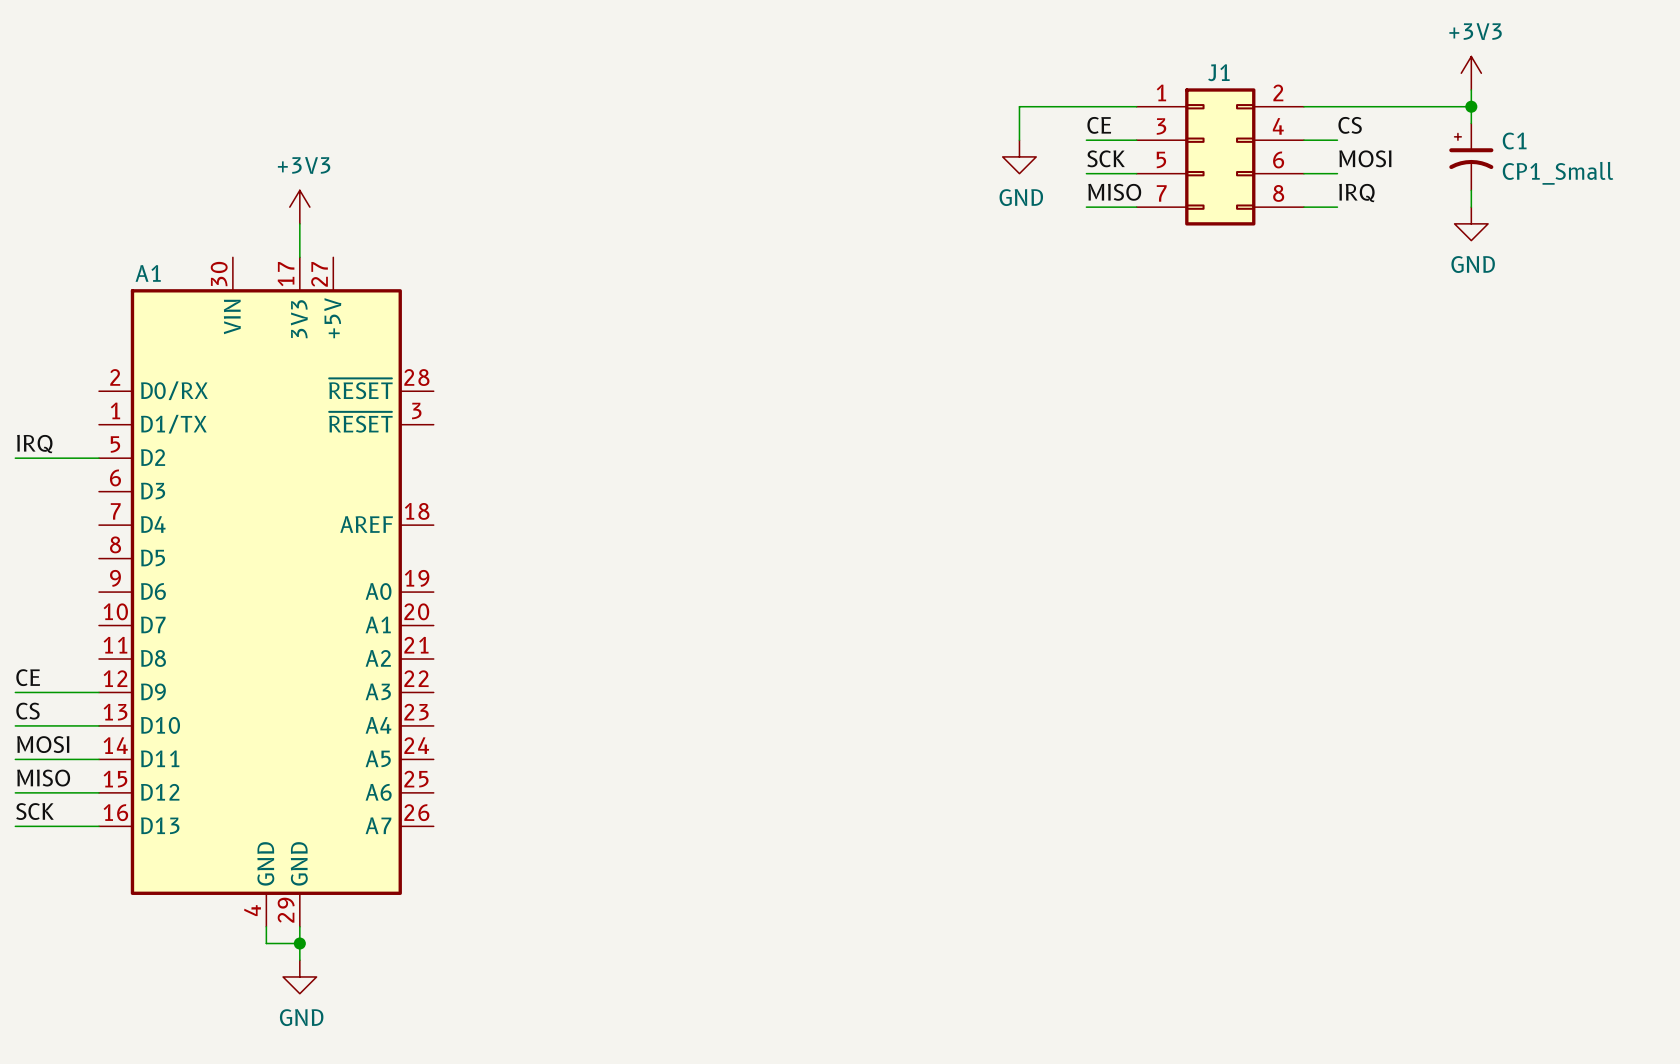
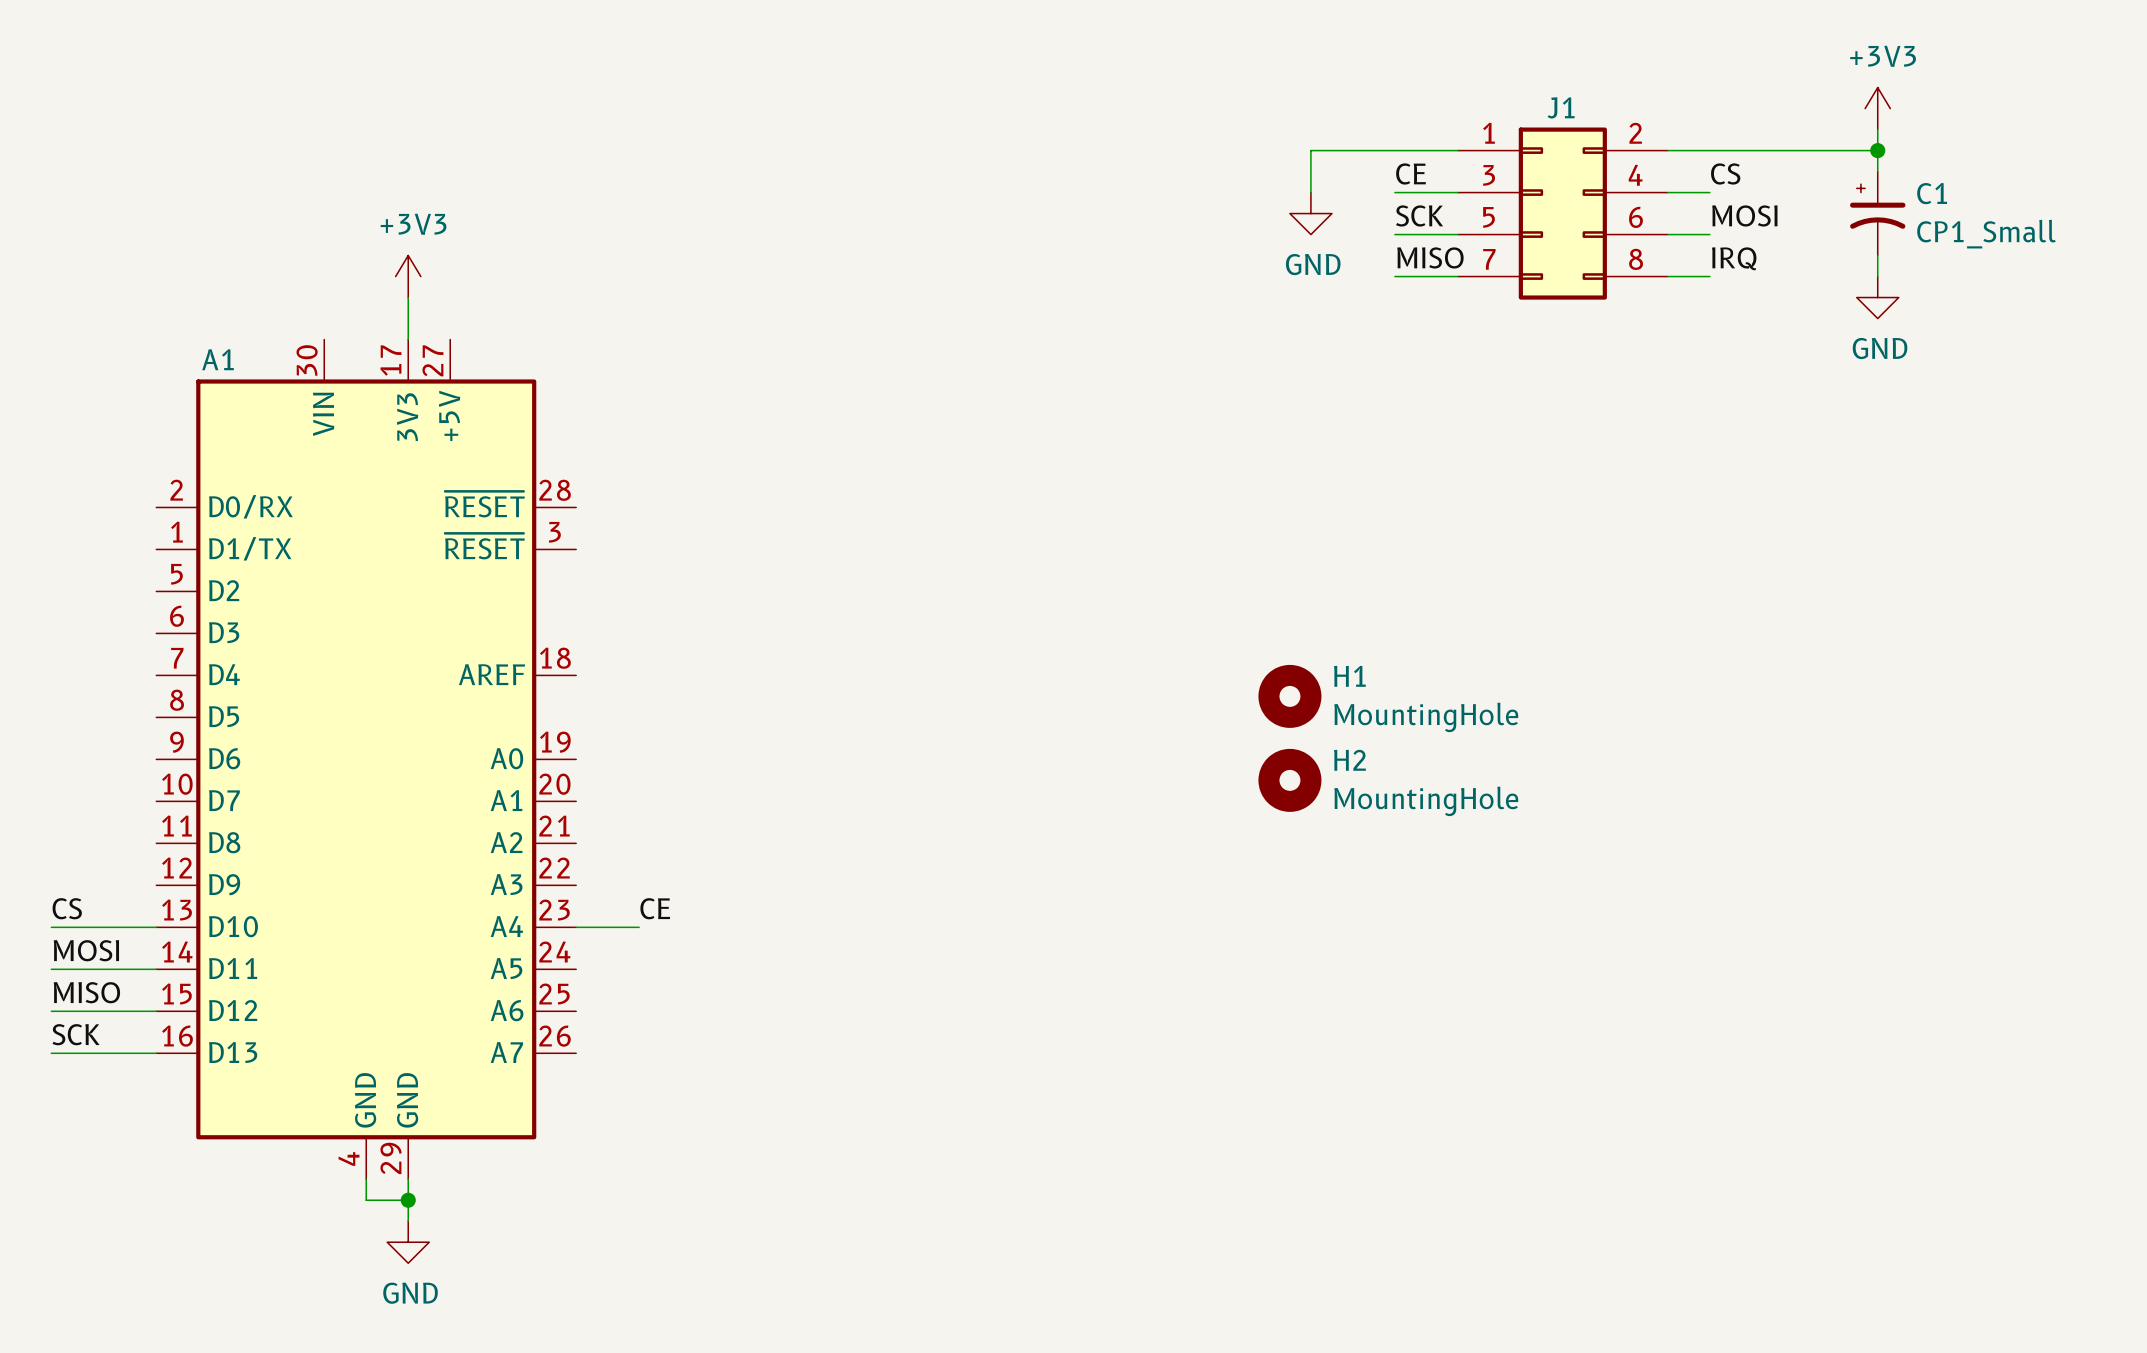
label: IRQ (34, 444) -> none
wire: (15, 458) (99, 458) -> none
H1: none -> MountingHole (1289, 696)
H2: none -> MountingHole (1289, 780)
label: CE (28, 677) -> none
wire: (15, 692) (99, 692) -> none
label: none -> CE (655, 908)
wire: none -> (576, 927) (639, 927)

